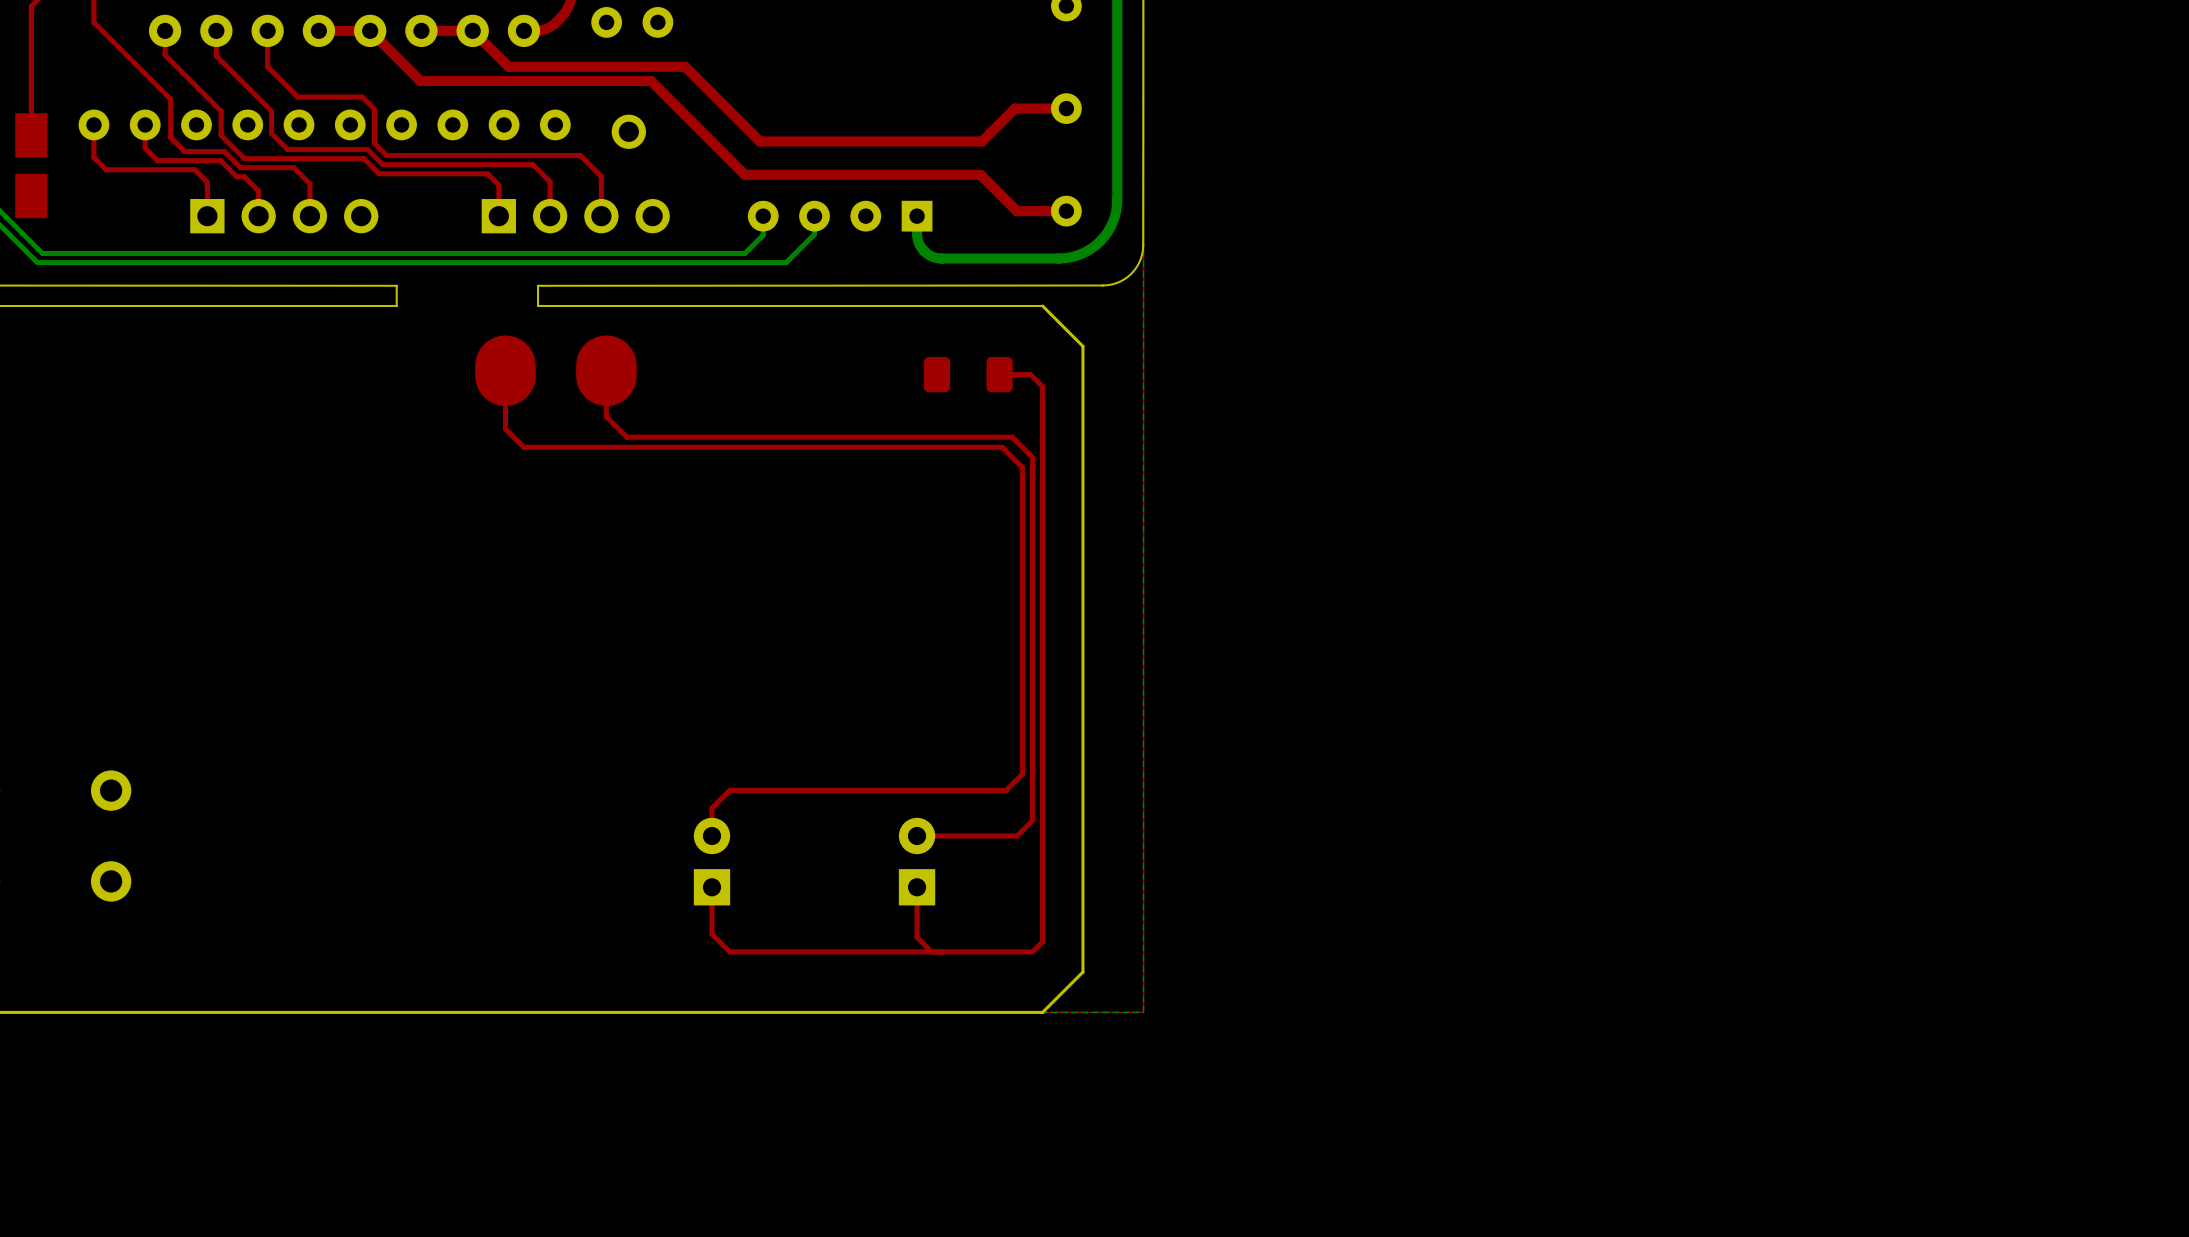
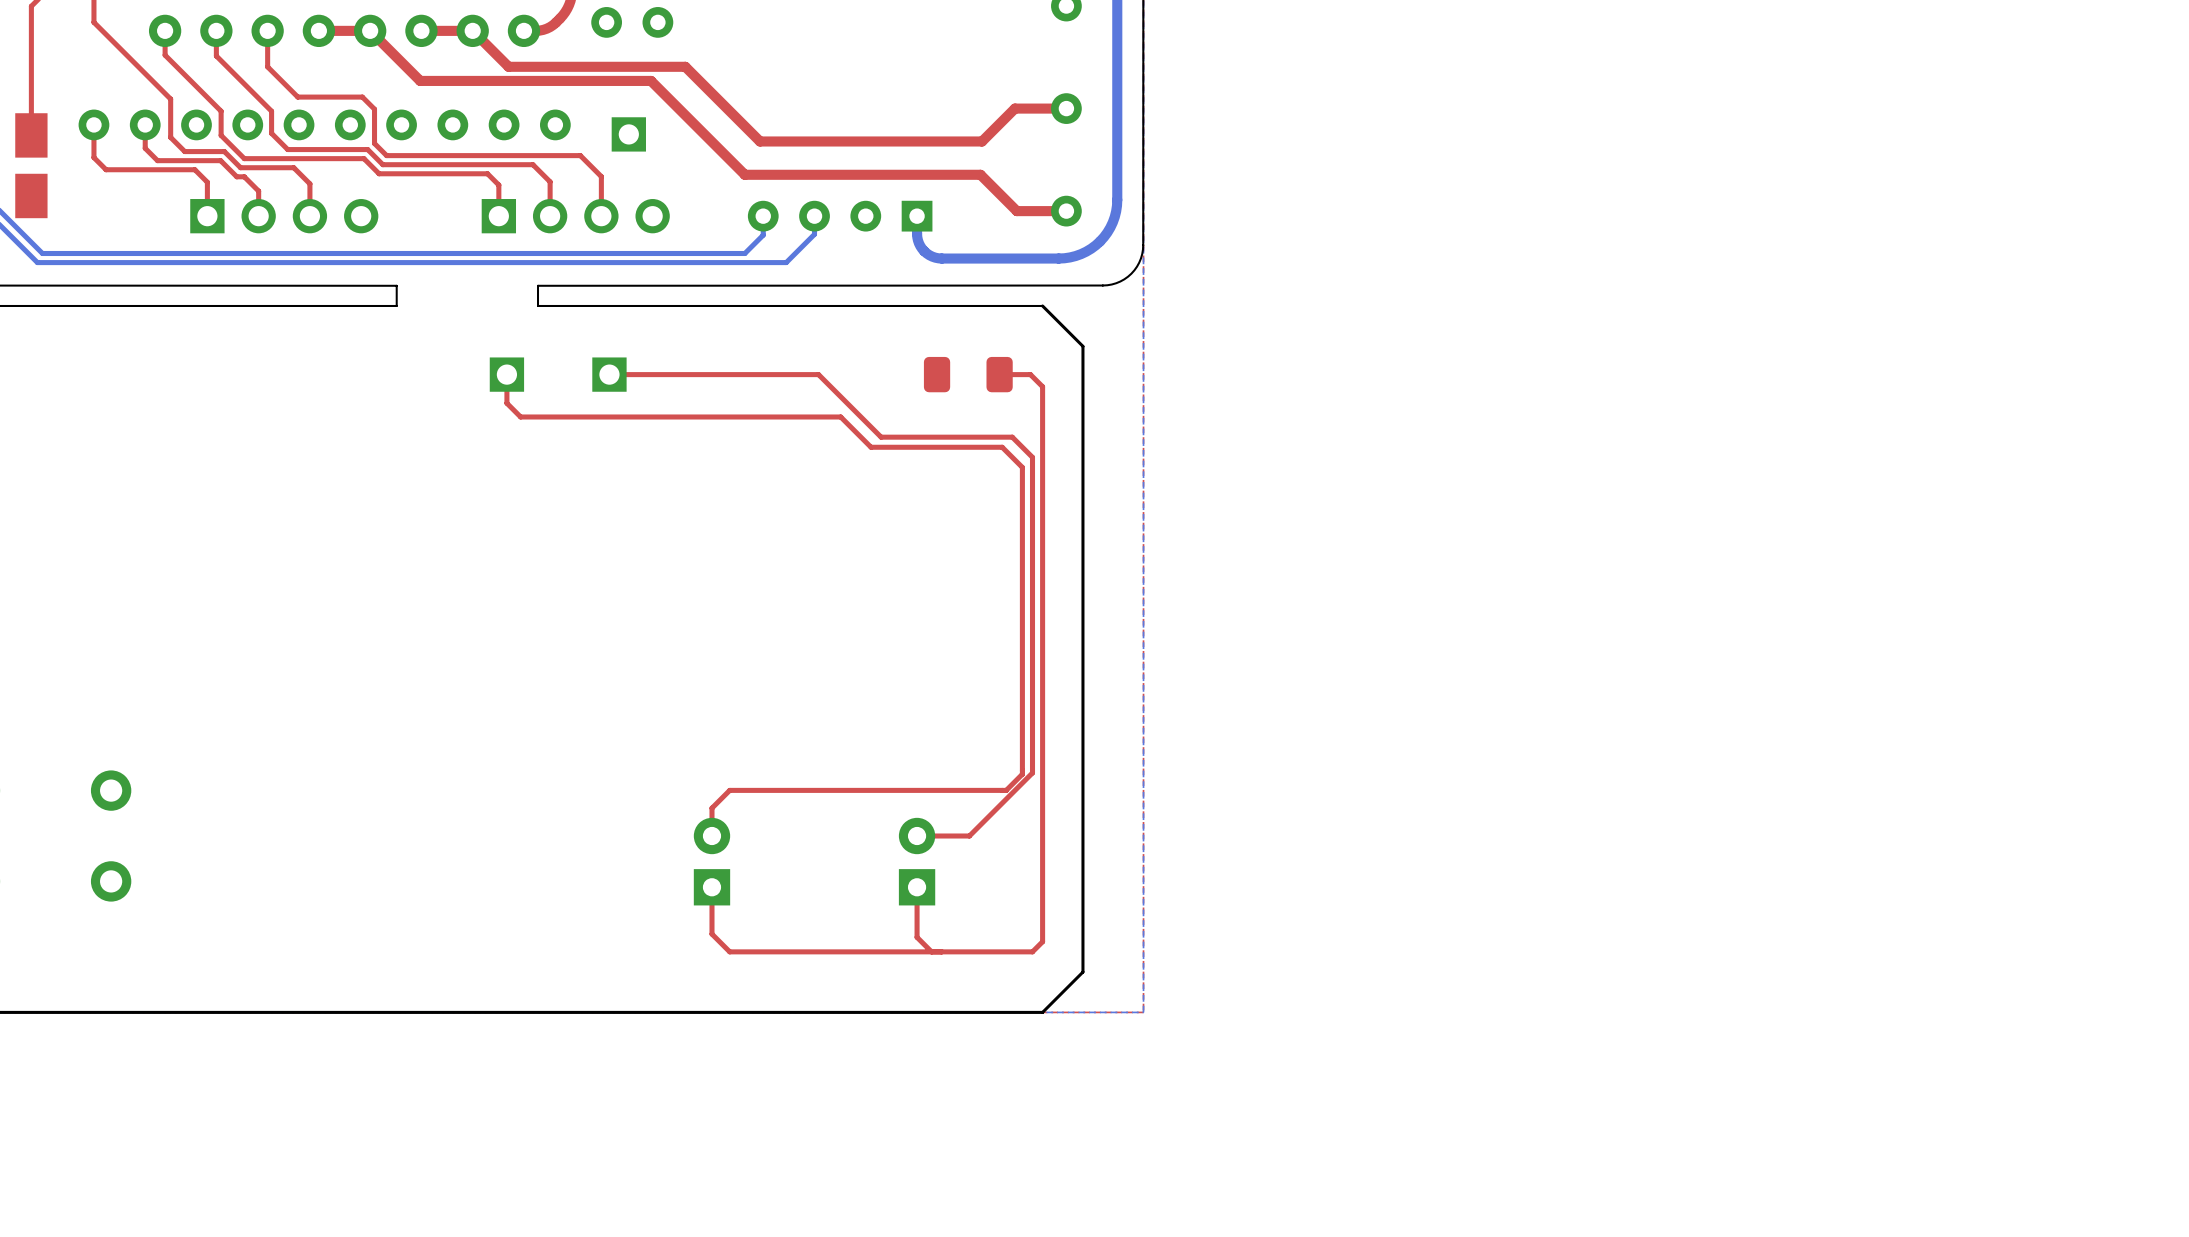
part footprint: [611, 114, 646, 149] -> [611, 117, 646, 152]
part footprint: [475, 335, 536, 407] -> [489, 357, 525, 392]
part footprint: [576, 335, 637, 407] -> [592, 357, 627, 392]
top track: (505, 370) (505, 428) (523, 447) (871, 447) -> (506, 374) (506, 403) (520, 416) (840, 416) (871, 447)
top track: (606, 370) (606, 416) (626, 437) (881, 437) -> (609, 374) (818, 374) (881, 437)
top track: (1032, 772) (1032, 820) (1017, 836) (969, 836) -> (1032, 772) (969, 836)

